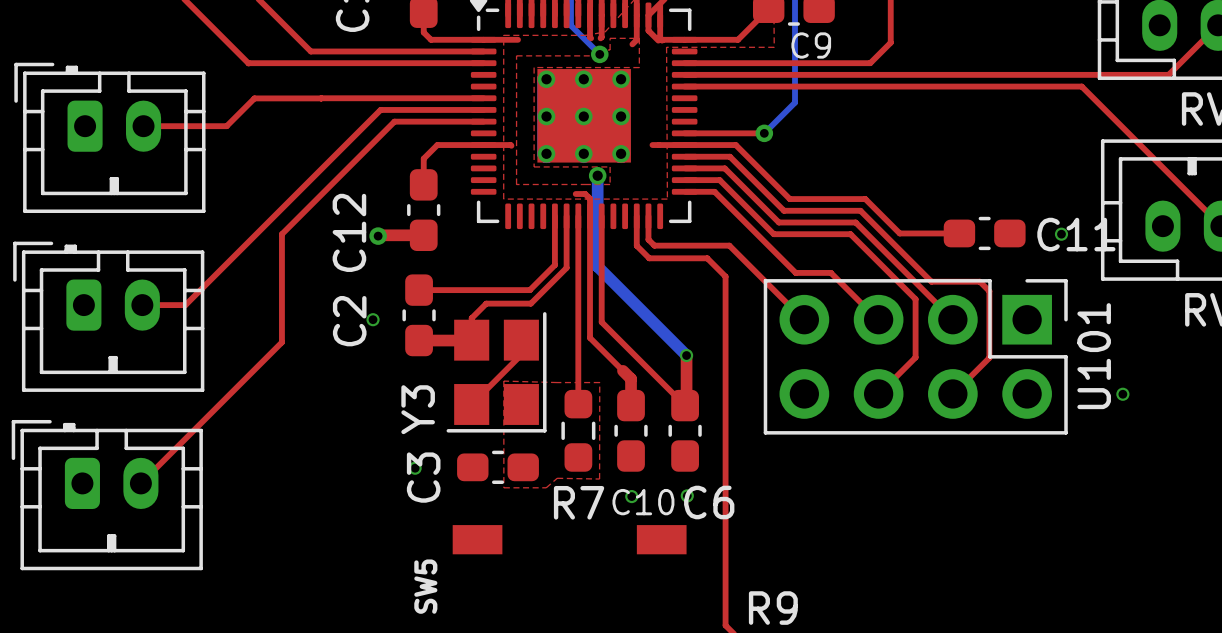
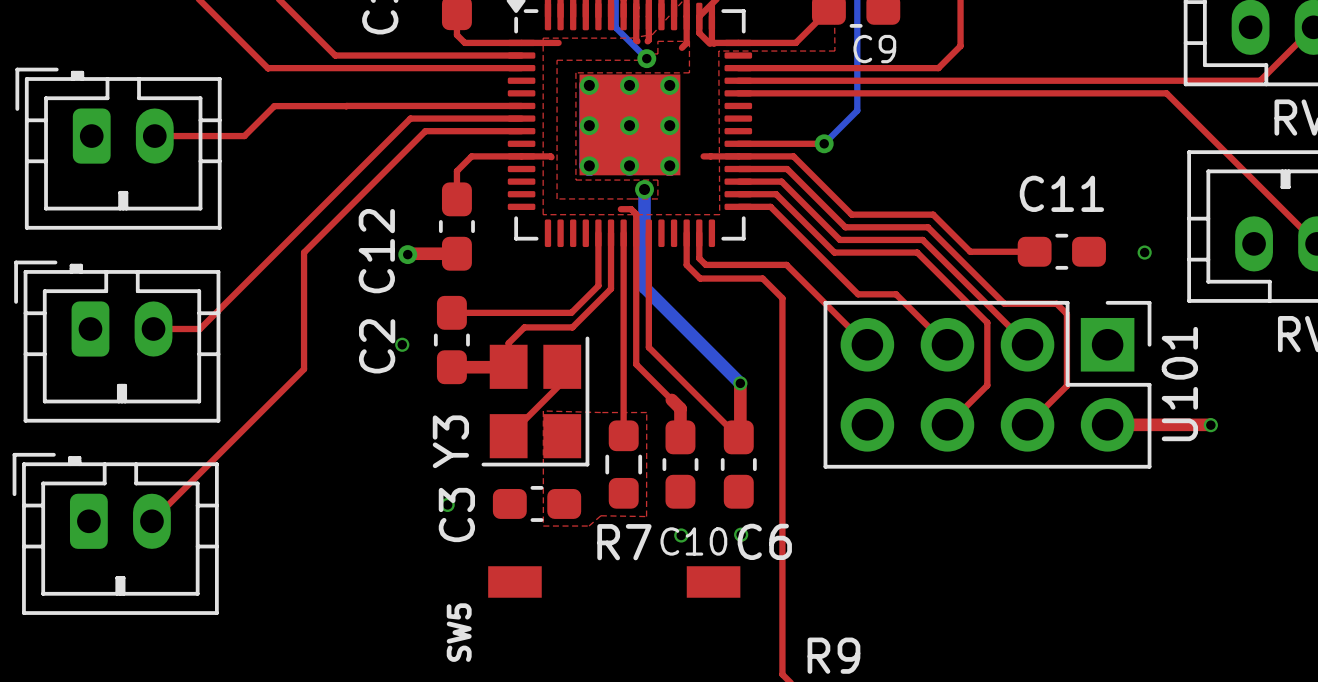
C11 name position: C11 (1076, 234) -> C11 (1061, 193)
top track: none -> (1107, 424) (1210, 424)

